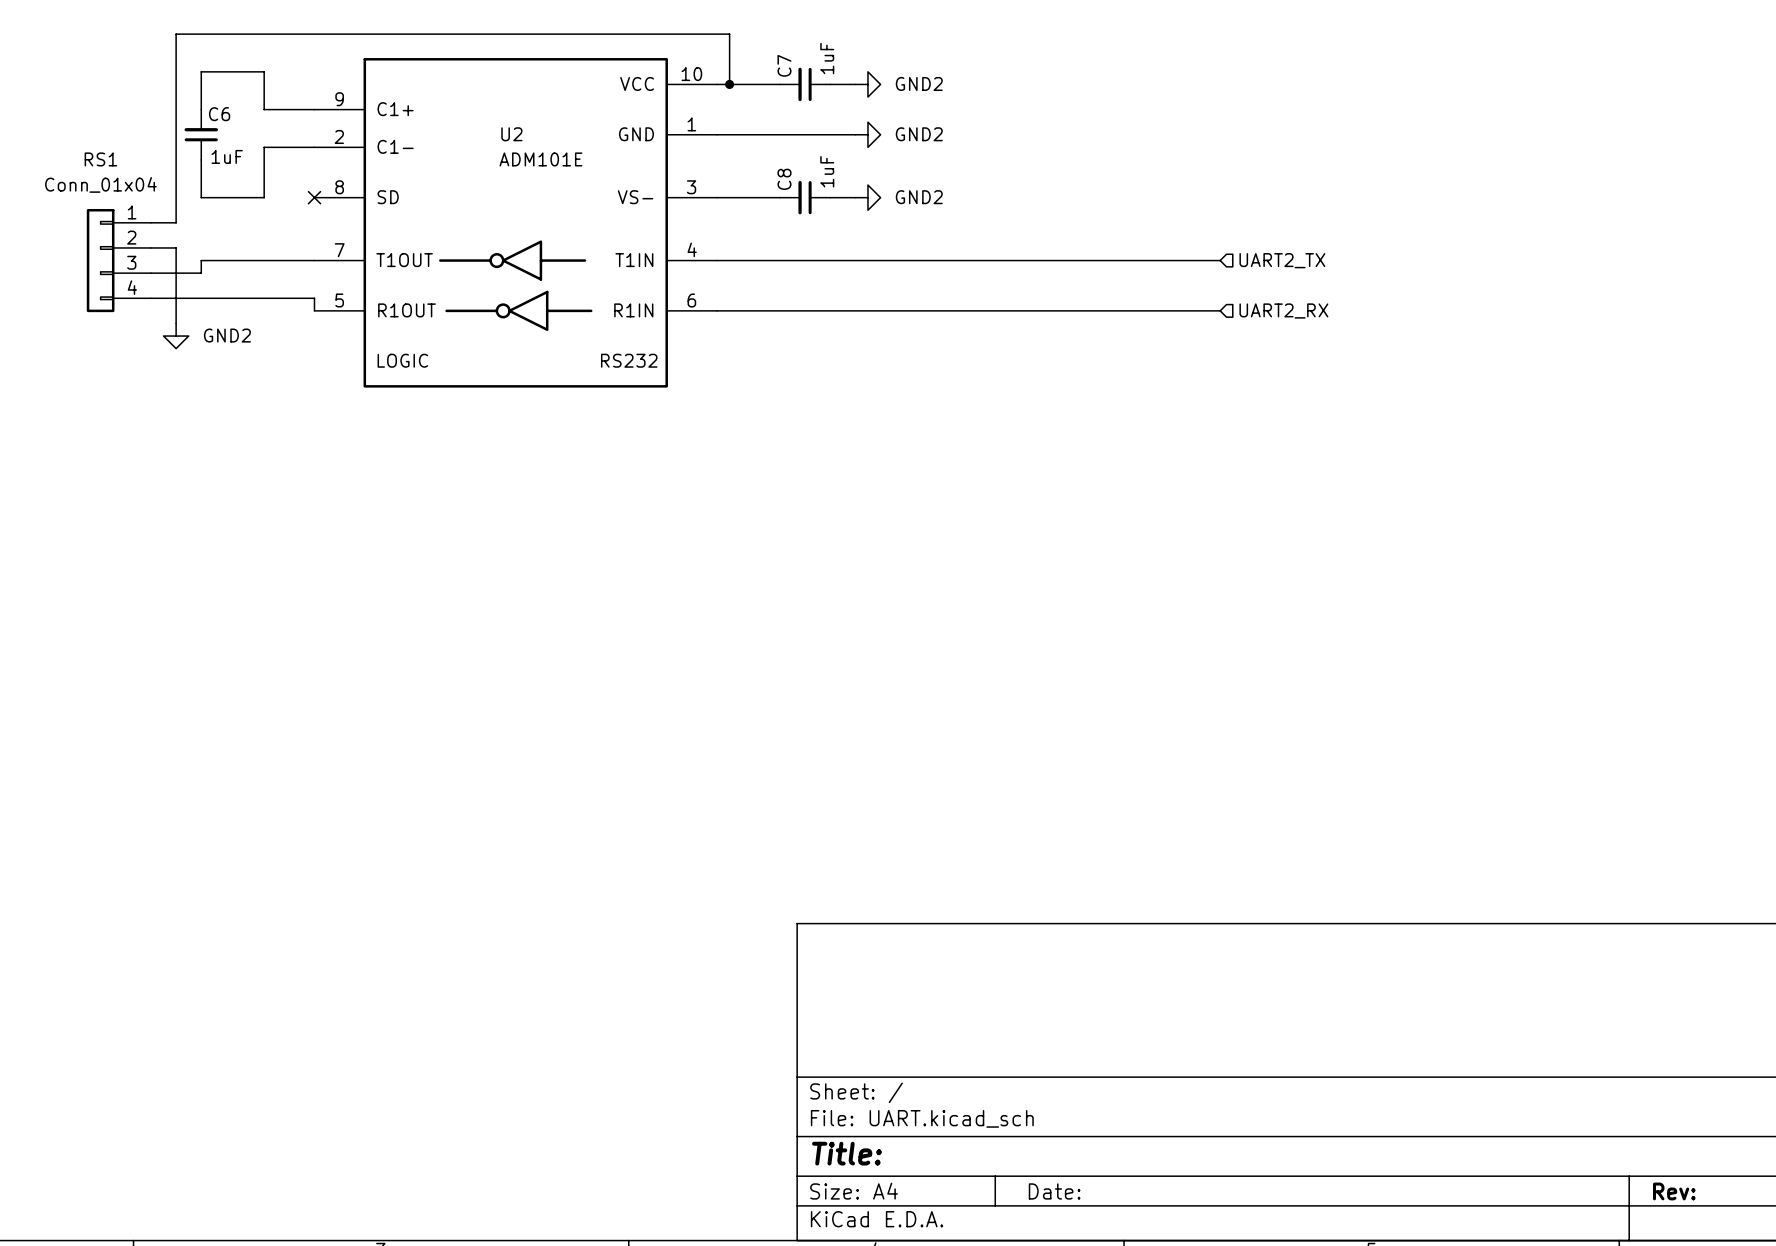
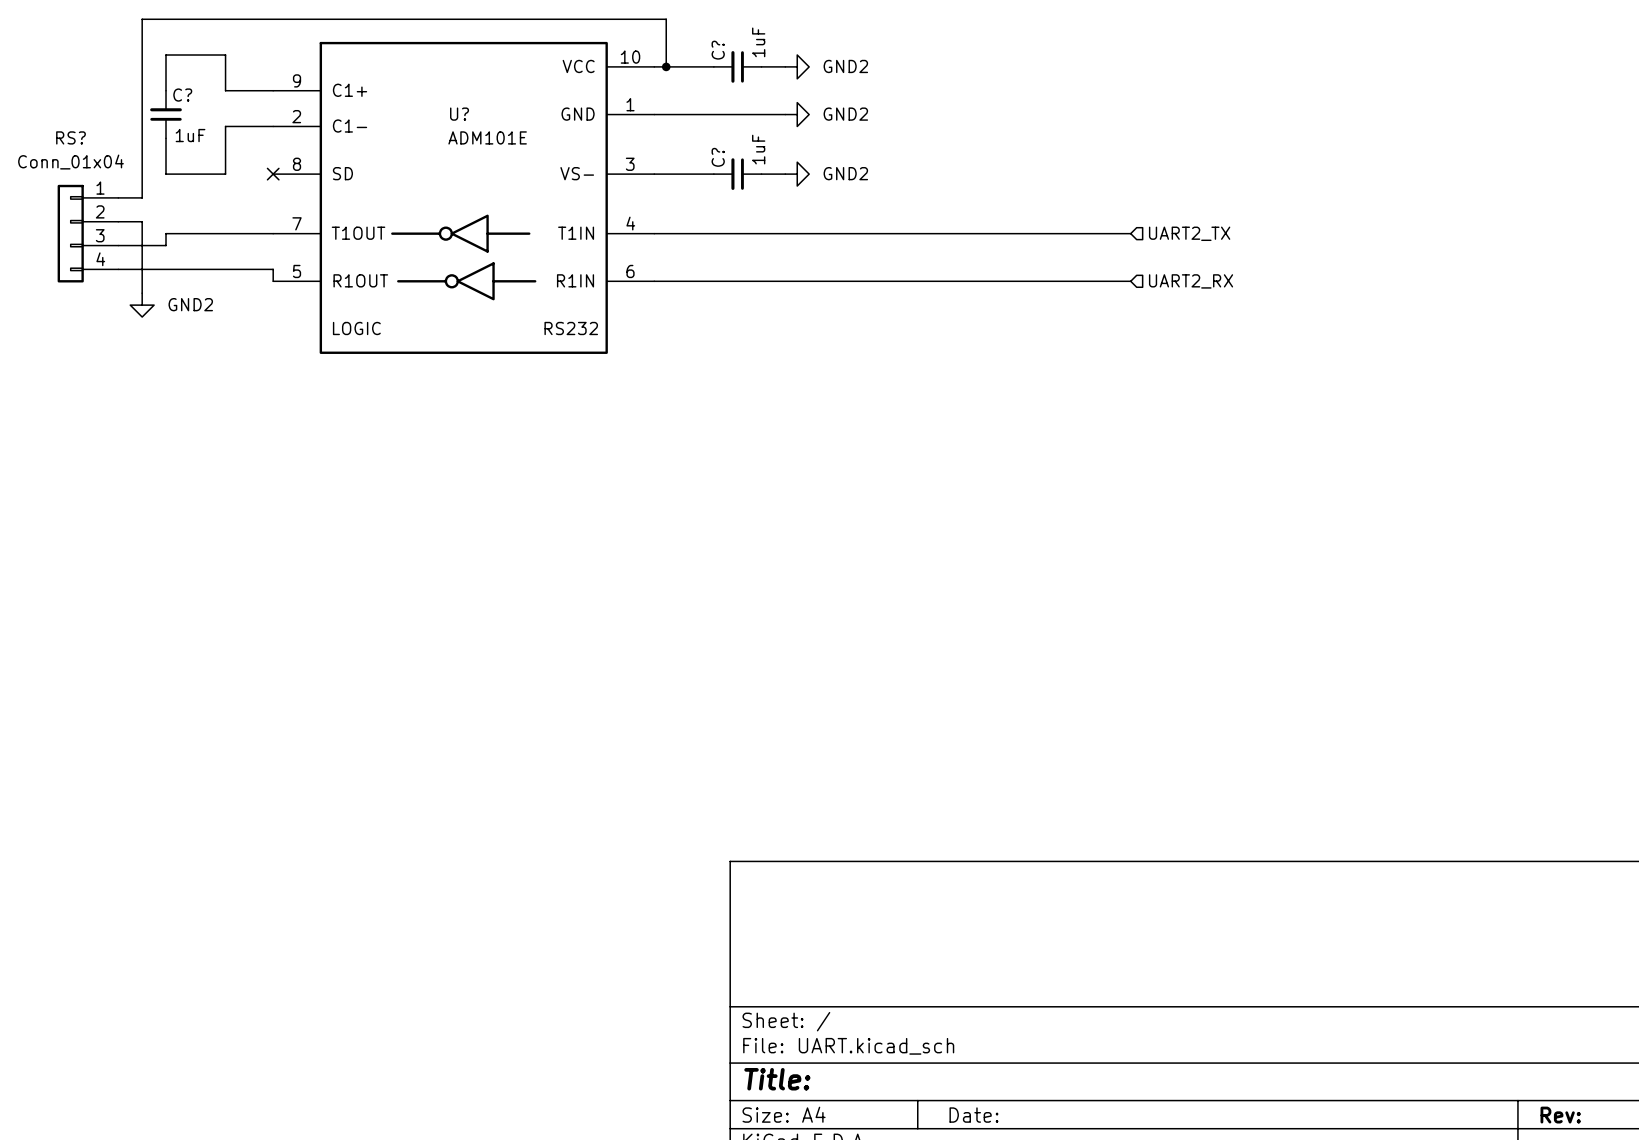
C7 name: C7 (784, 65) -> C? (718, 50)
C6 name: C6 (219, 114) -> C? (182, 95)
U2 name: U2 (511, 134) -> U? (459, 114)
RS1 name: RS1 (100, 159) -> RS? (71, 137)
C8 name: C8 (784, 179) -> C? (718, 157)

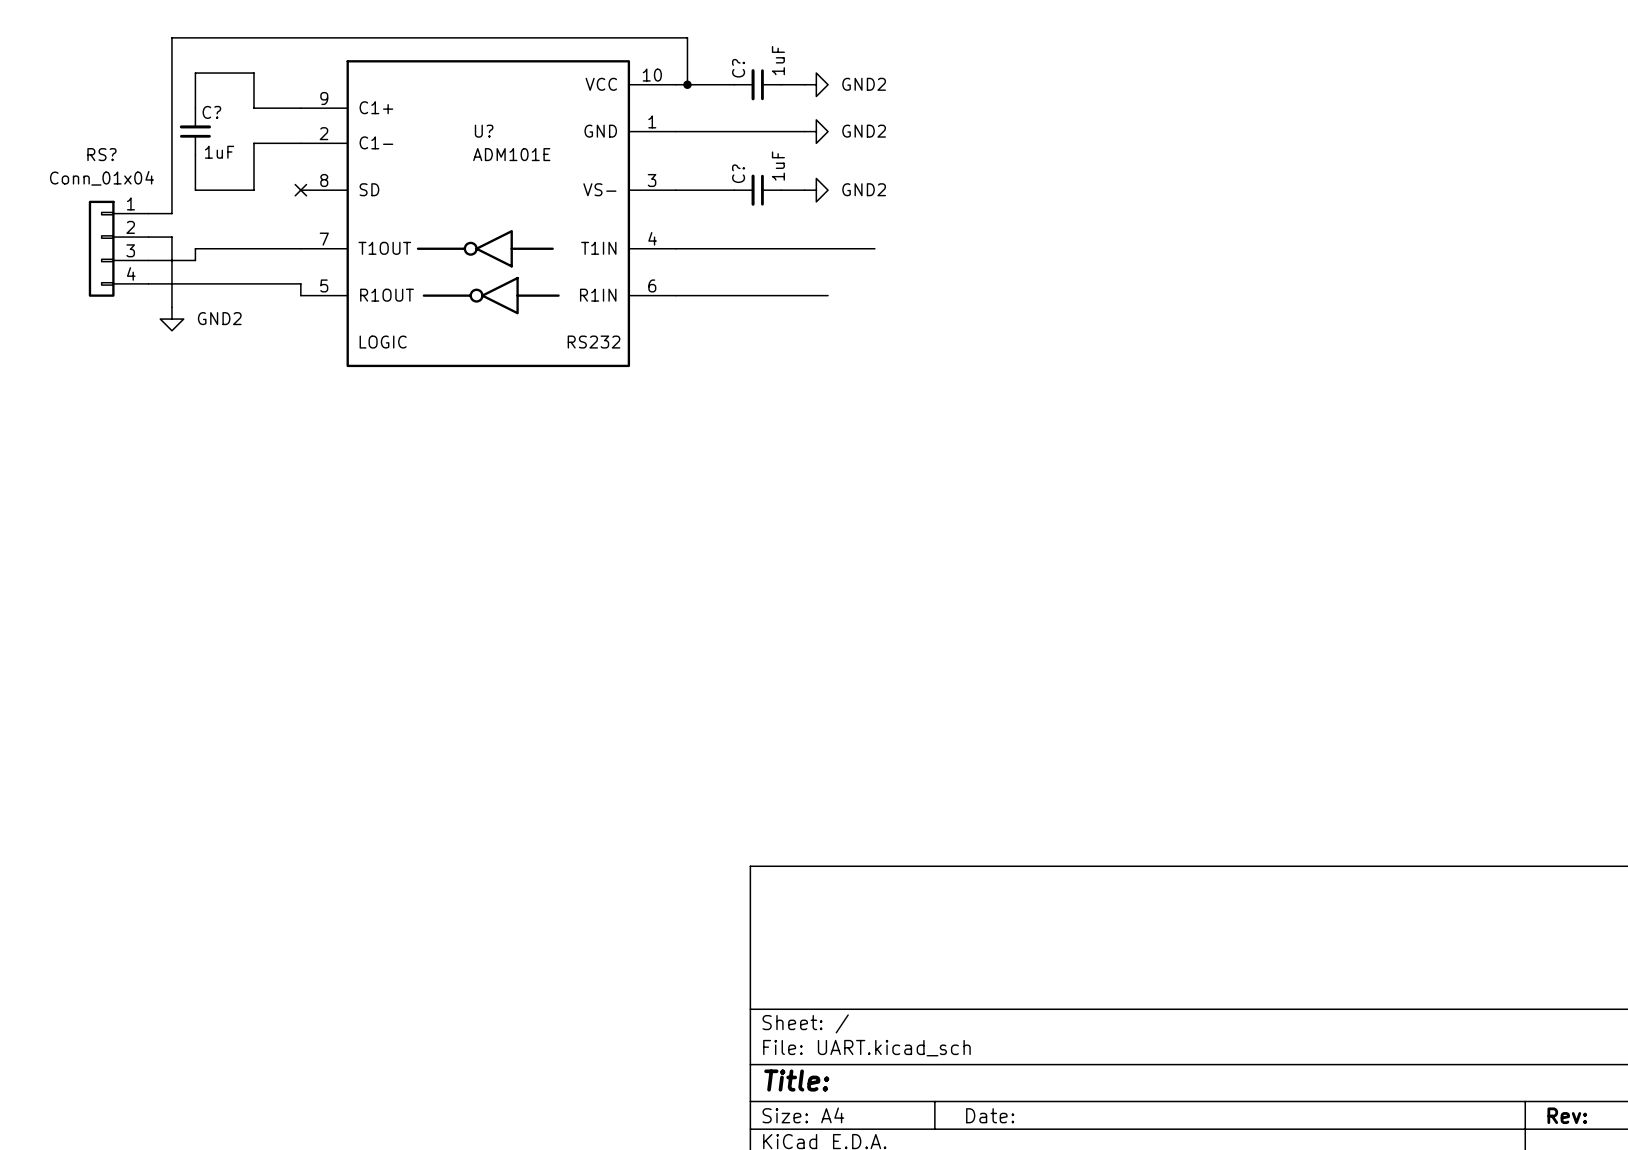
wire: (856, 233) (1130, 233) -> none
hierarchical label: UART2_TX (1189, 233) -> none
wire: (809, 281) (1130, 281) -> none
hierarchical label: UART2_RX (1191, 281) -> none

